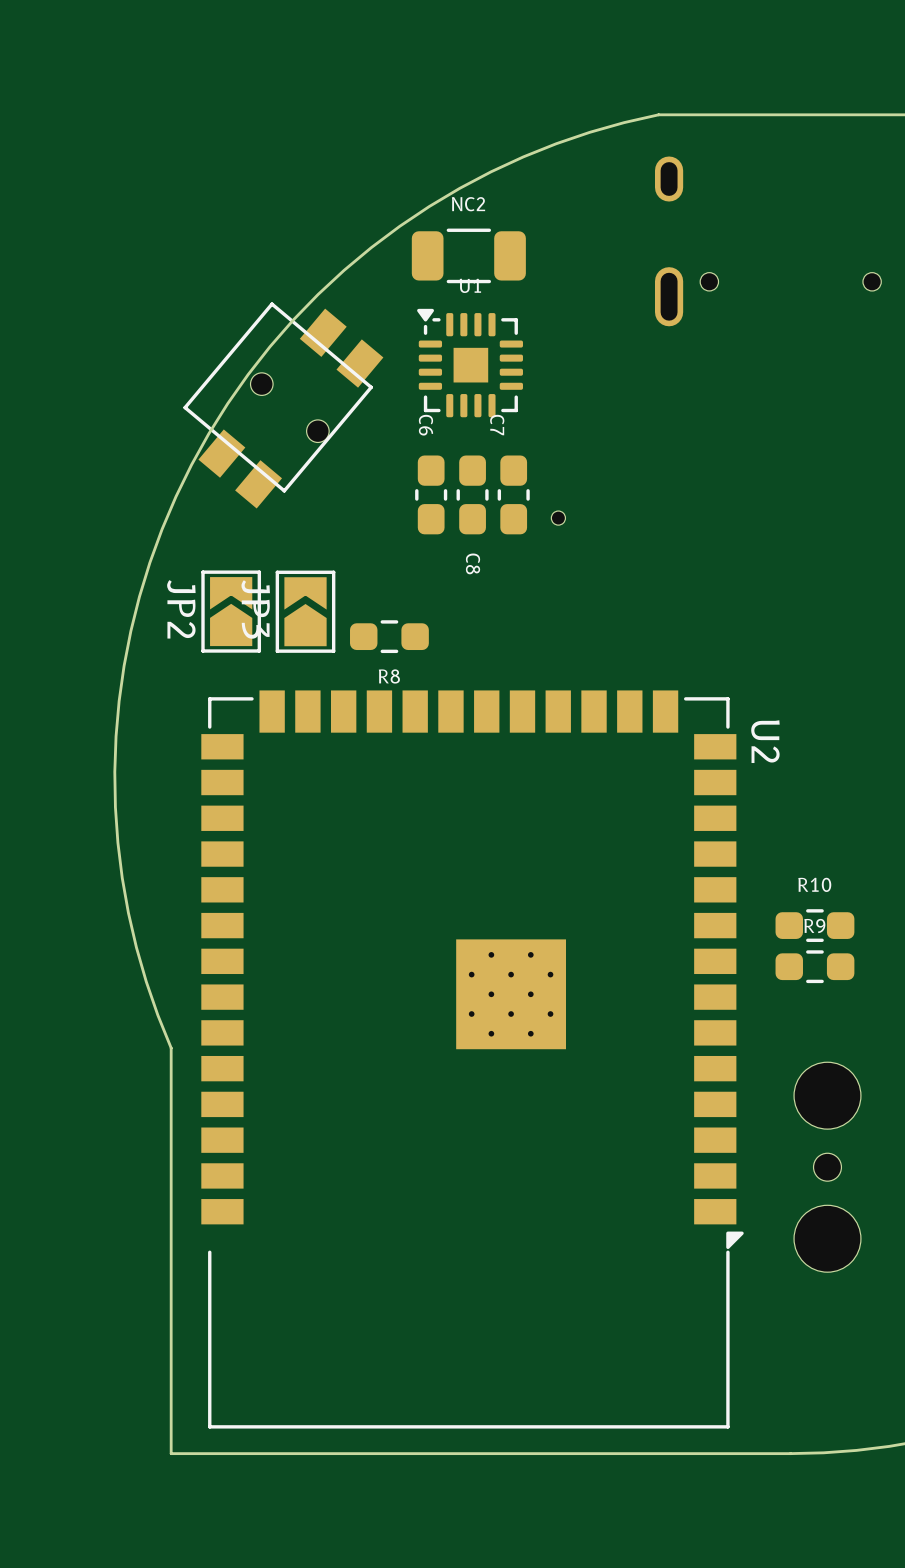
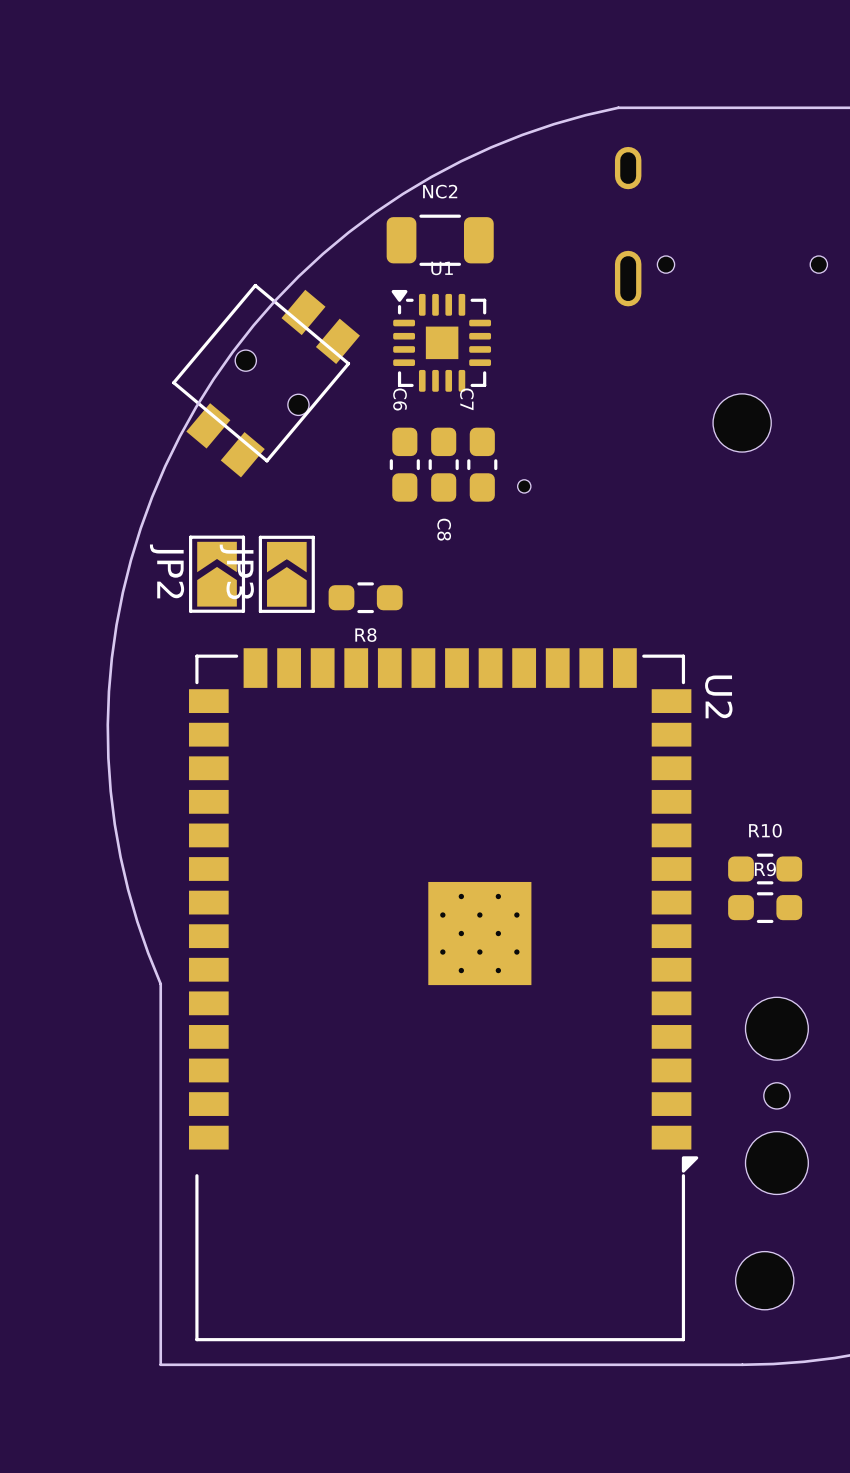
part: none -> (742, 422)
part: none -> (764, 1280)

